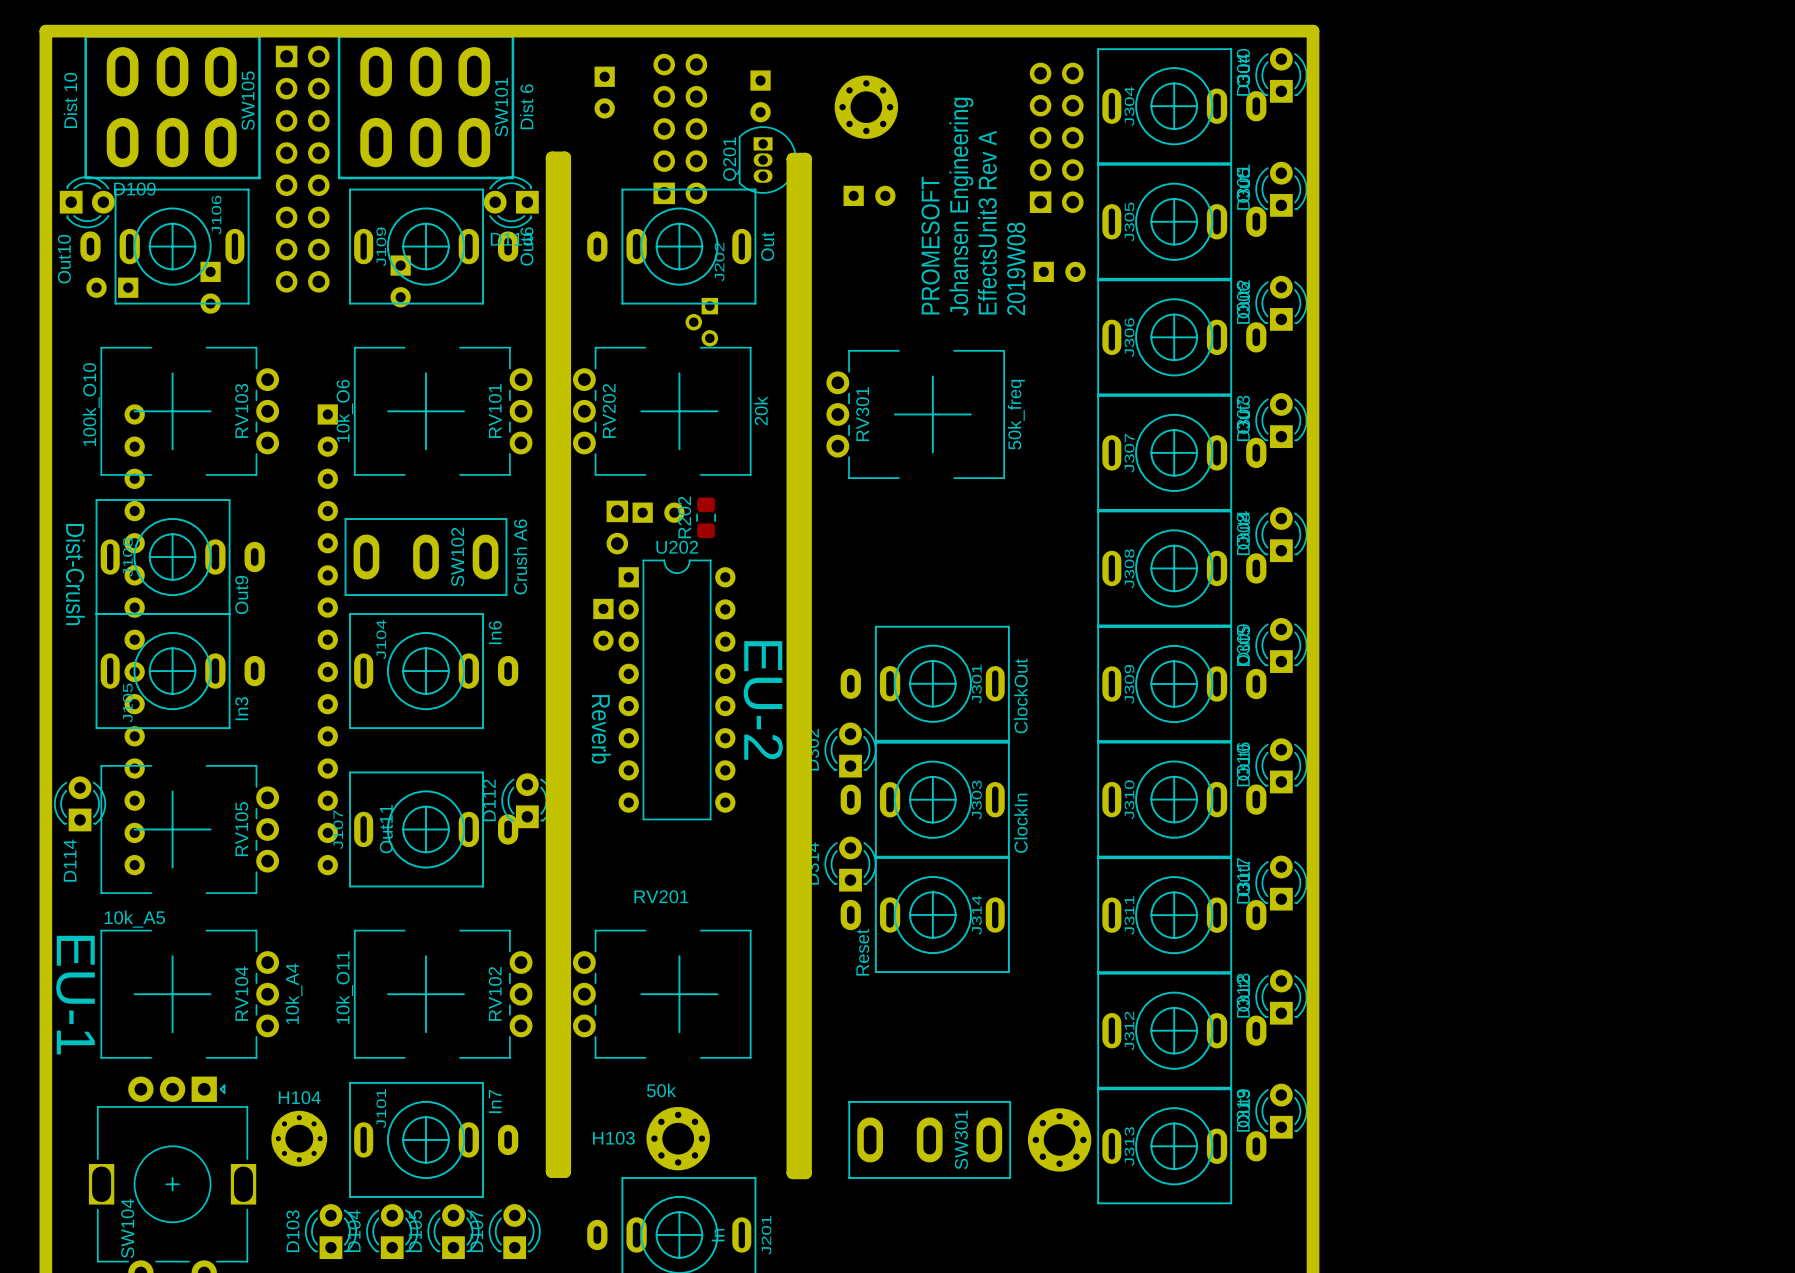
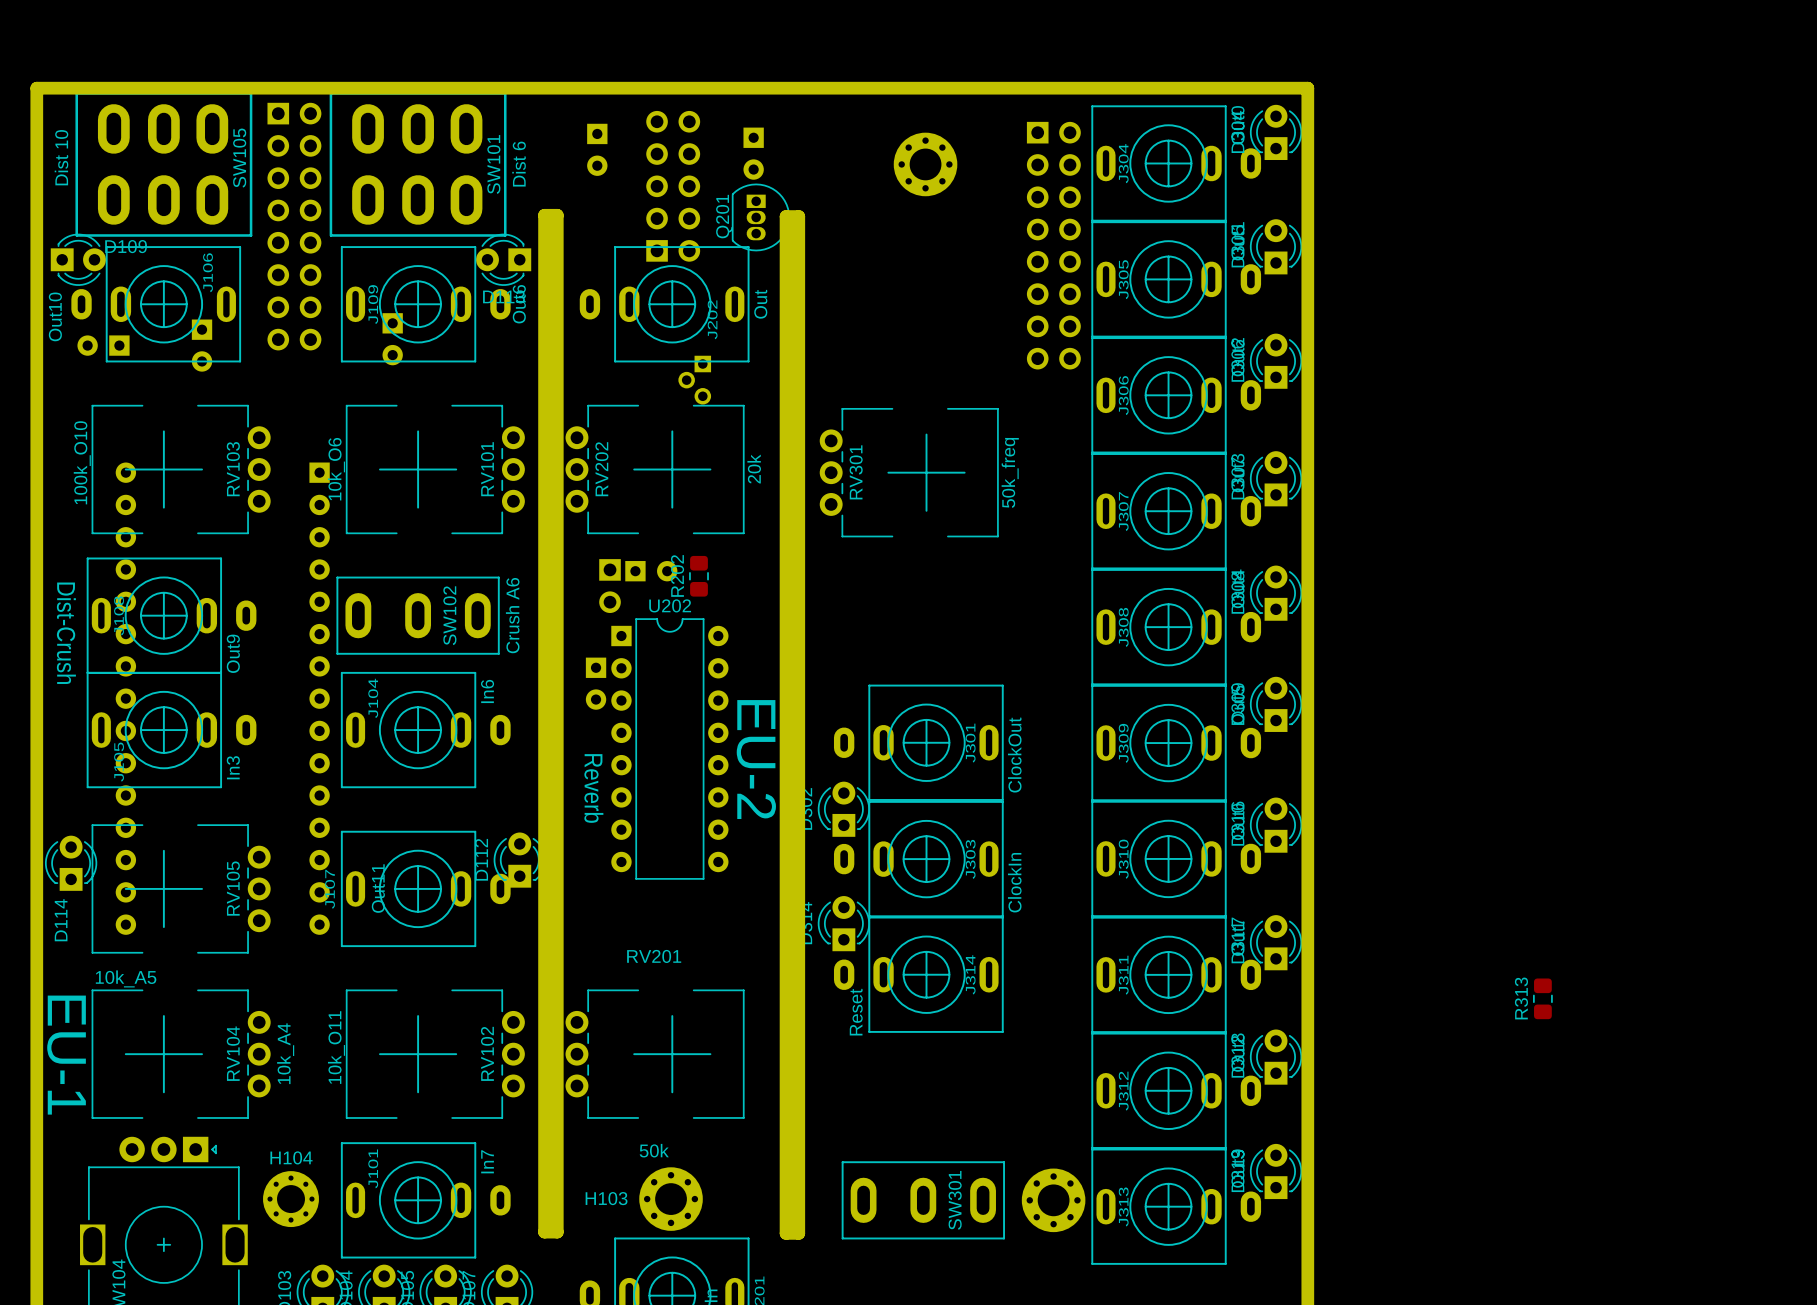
part position: (866, 107) -> (925, 164)
part: (1056, 137) -> none
part: none -> (1053, 245)
part: (869, 195) -> none
text: Johansen Engineering (961, 206) -> none
text: EffectsUnit3 Rev A (987, 222) -> none
text: PROMESOFT (930, 245) -> none
text: 2019W08 (1016, 268) -> none
part: (1059, 271) -> none
R313: none -> (1542, 998)

